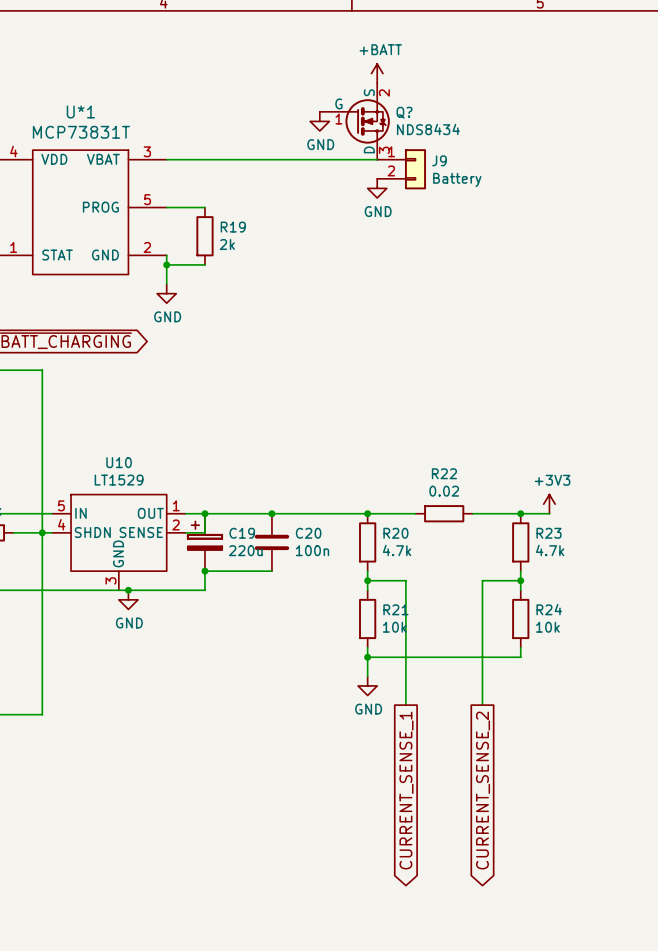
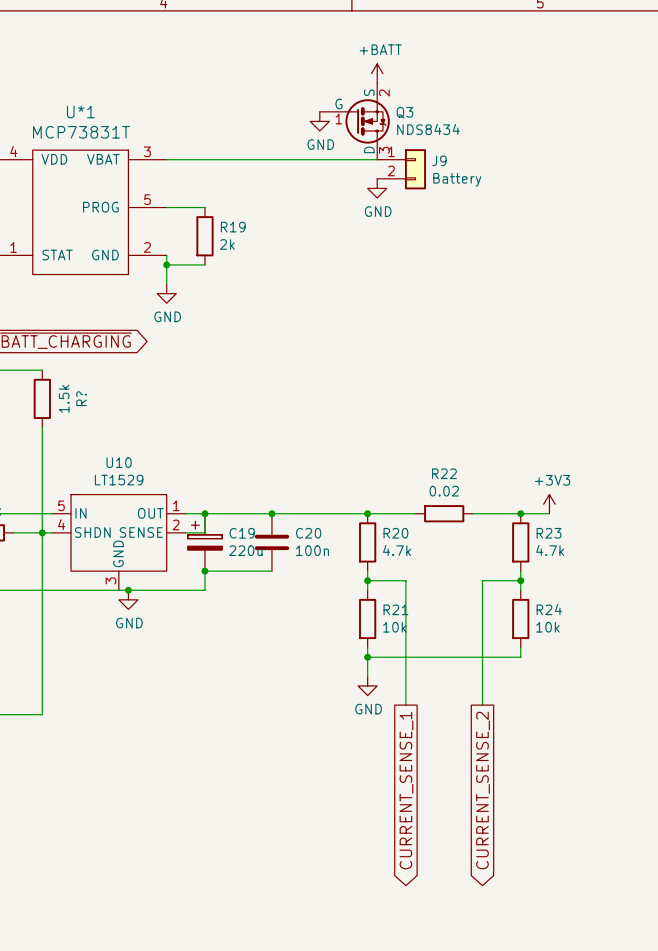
Q? name: Q? (404, 112) -> Q3 (404, 112)
wire: (42, 370) (42, 427) -> none
R?: none -> 1.5k (42, 398)

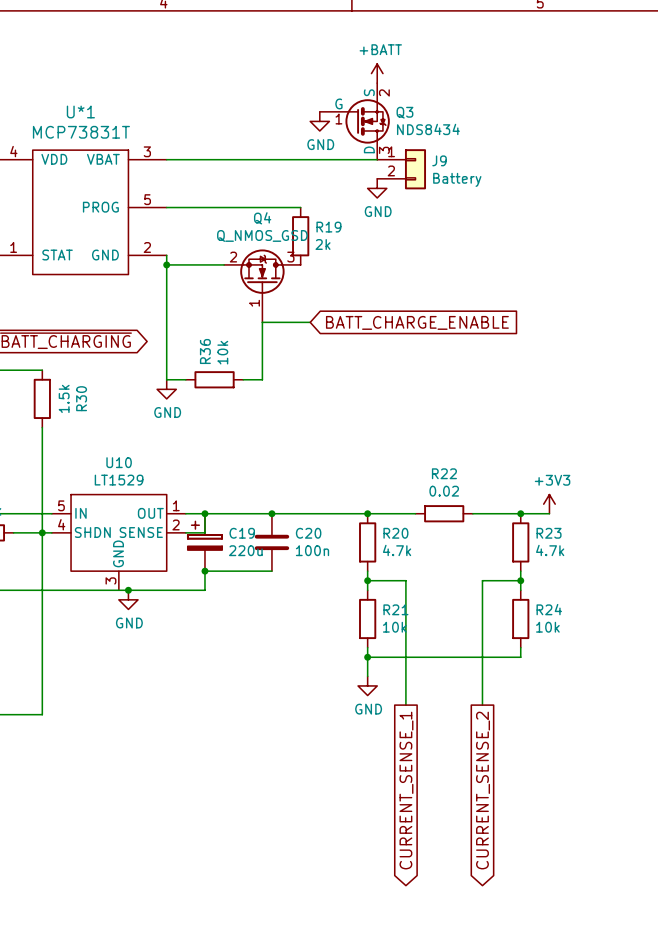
wire: none -> (204, 207) (300, 207)
R19 position: (204, 236) -> (300, 236)
wire: none -> (204, 264) (224, 264)
wire: none -> (166, 284) (166, 379) (185, 379)
Q4: none -> Q_NMOS_GSD (262, 285)
power symbol position: GND (166, 293) -> GND (166, 389)
wire: none -> (310, 322) (262, 322) (262, 379) (243, 379)
global label: none -> BATT_CHARGE_ENABLE (417, 322)
R36: none -> 10k (214, 379)
R? name: R? (81, 398) -> R30 (81, 398)

